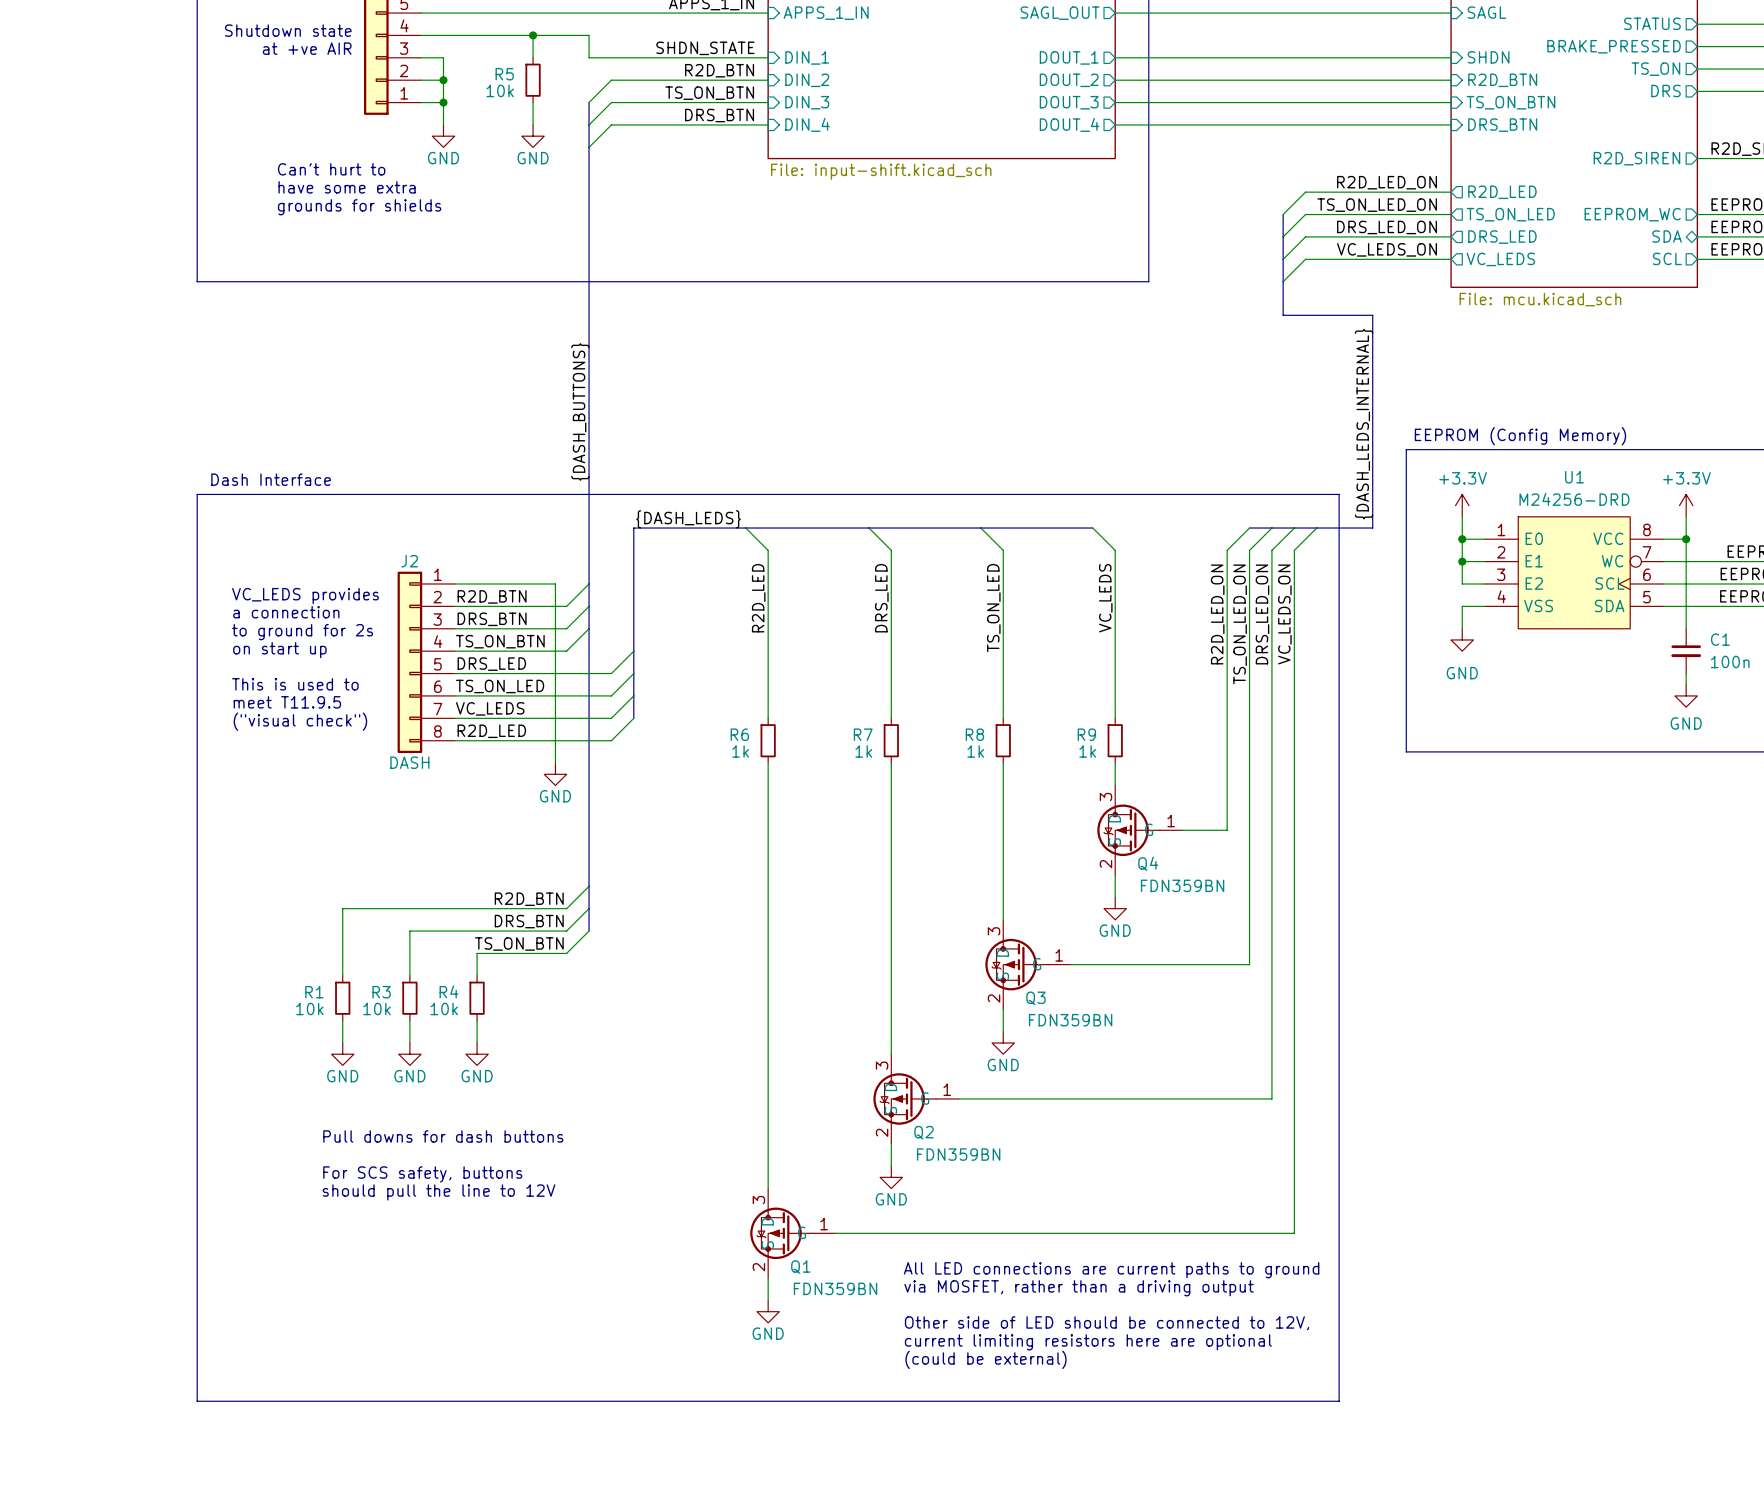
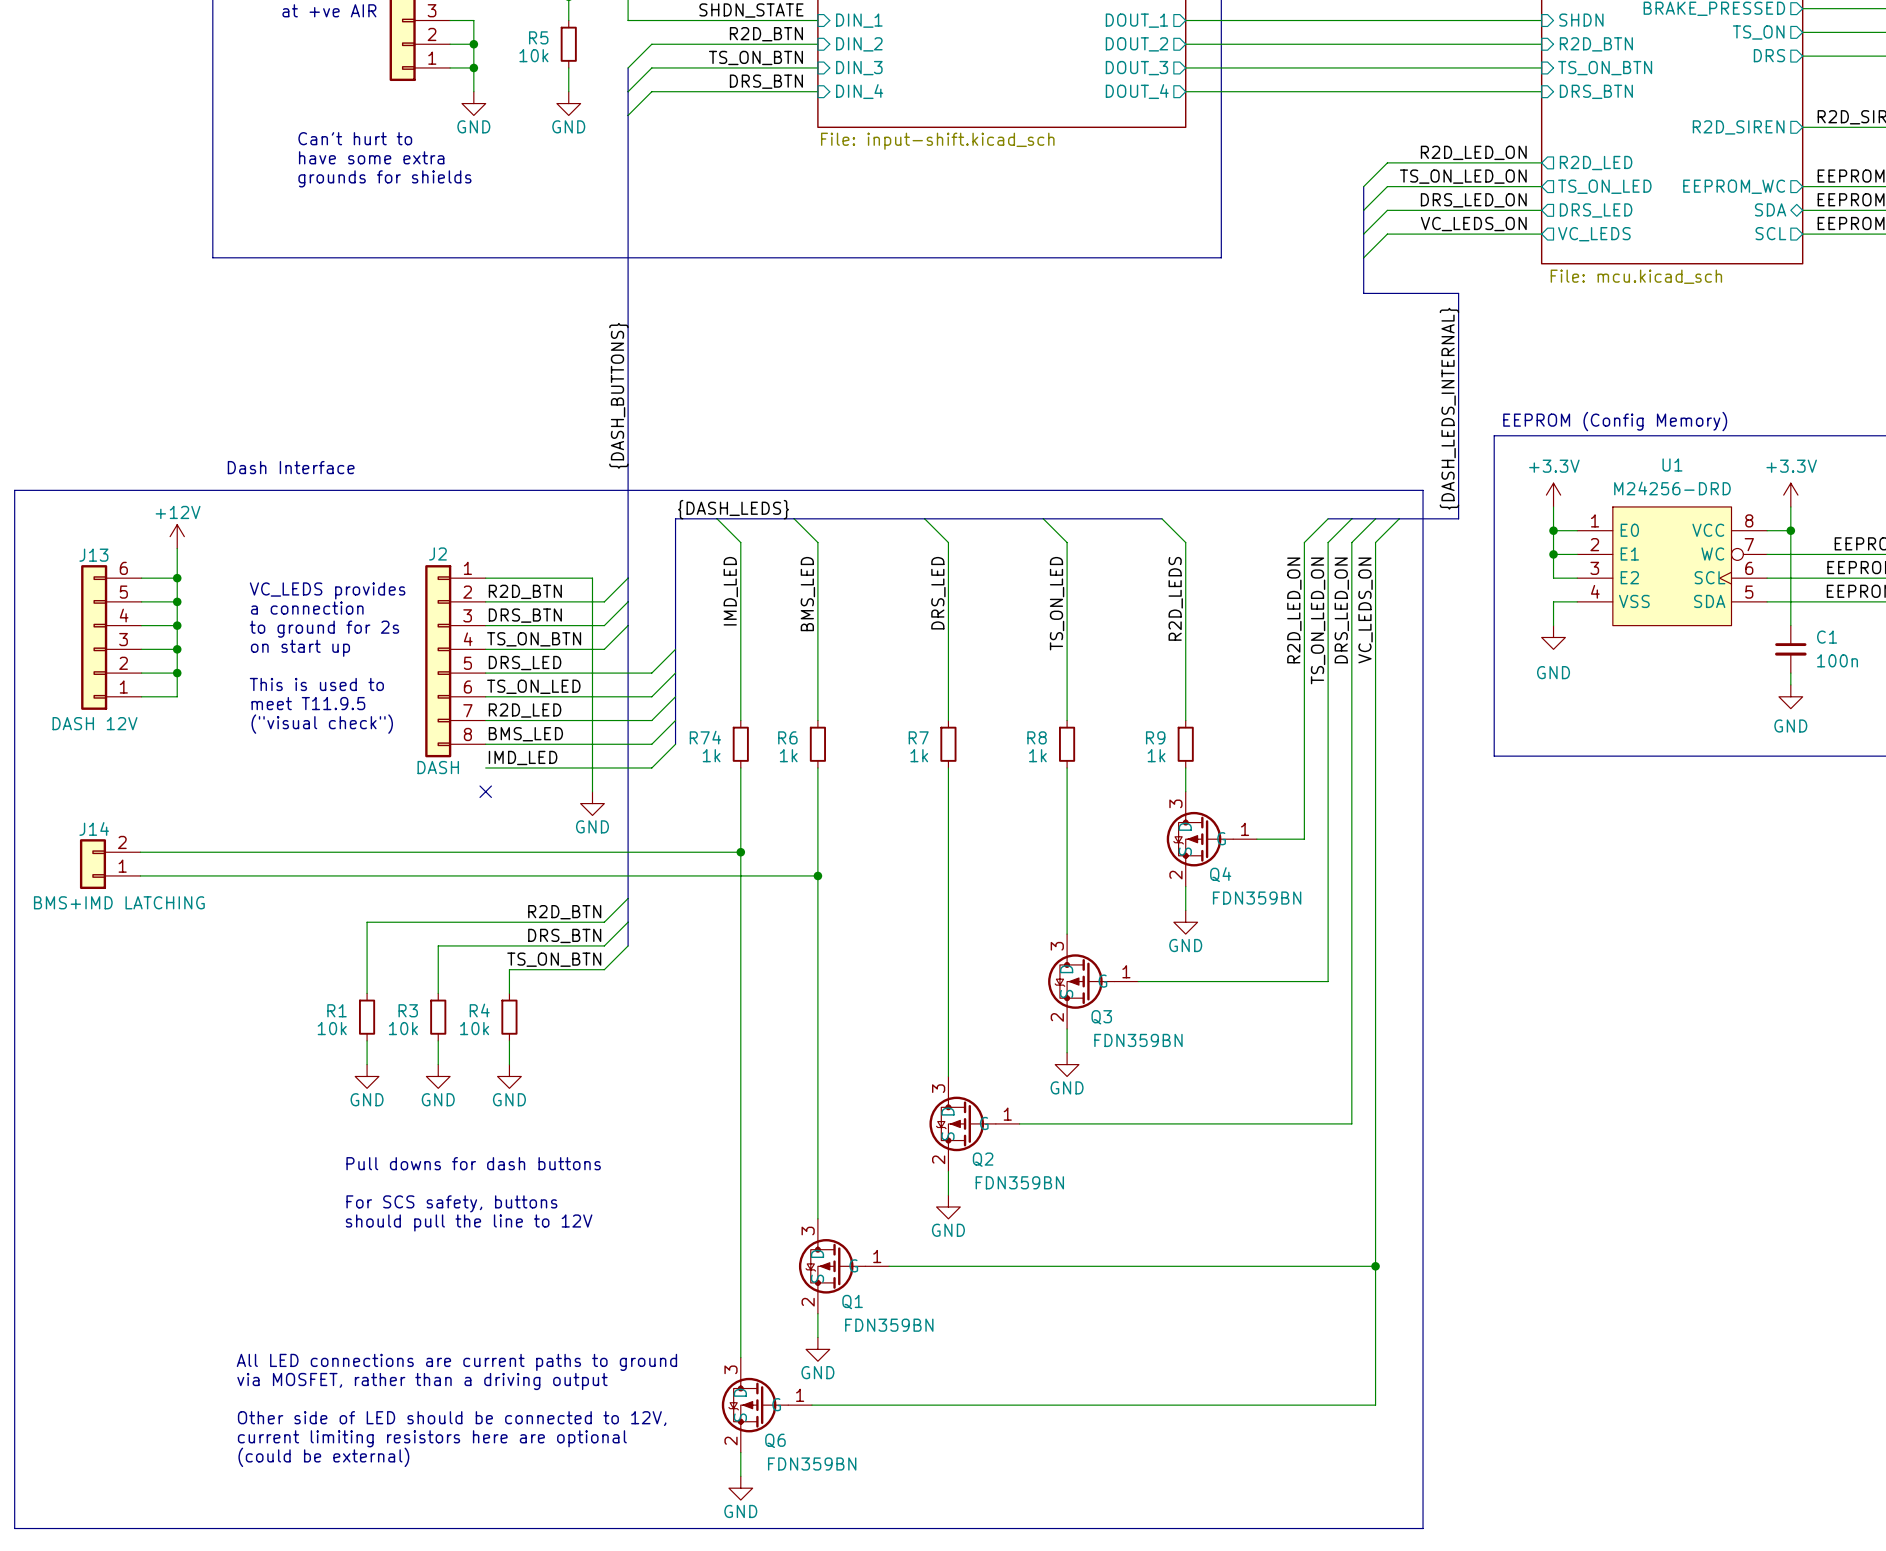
line: (1339, 501) (1339, 494) (197, 494) (197, 1401) (1339, 1401) -> (1423, 490) (14, 490) (14, 1528) (1423, 1528) (1423, 1444)
wire: none -> (717, 518) (740, 542) (740, 720)
power symbol: none -> +12V (177, 536)
wire: none -> (177, 548) (177, 696) (141, 696)
wire: none -> (141, 578) (177, 578)
junction: none -> (177, 578)
label: none -> IMD_LED (730, 591)
label: R2D_LED (758, 598) -> BMS_LED (807, 594)
label: VC_LEDS (1105, 598) -> R2D_LEDS (1175, 598)
wire: none -> (141, 601) (177, 601)
junction: none -> (177, 601)
wire: none -> (141, 625) (177, 625)
junction: none -> (177, 625)
J13: none -> DASH 12V (111, 637)
wire: none -> (141, 649) (177, 649)
junction: none -> (177, 649)
wire: none -> (141, 673) (177, 673)
junction: none -> (177, 673)
label: VC_LEDS (490, 708) -> R2D_LED (525, 710)
bus: none -> (675, 720) (675, 744)
label: R2D_LED (491, 731) -> BMS_LED (525, 734)
wire: none -> (675, 744) (651, 767) (485, 767)
R74: none -> 1k (740, 744)
label: none -> IMD_LED (523, 757)
wire: none -> (740, 767) (740, 1357)
power symbol position: GND (555, 774) -> GND (592, 803)
no-connect mark: none -> (485, 791)
wire: none -> (140, 852) (740, 852)
junction: none -> (740, 852)
J14: none -> BMS+IMD LATCHING (110, 864)
wire: none -> (140, 875) (817, 875)
junction: none -> (817, 875)
wire: none -> (1375, 1266) (1375, 1405) (811, 1405)
junction: none -> (1375, 1266)
text: All LED connections are current paths to ground (1111, 1270) -> none
text: via MOSFET, rather than a driving output (1079, 1288) -> none
text: none -> All LED connections are current paths to ground (456, 1362)
text: Other side of LED should be connected to 12V, (1107, 1323) -> none
text: none -> via MOSFET, rather than a driving output (422, 1381)
text: current limiting resistors here are optional (1088, 1342) -> none
text: (could be external) (986, 1359) -> none
Q6: none -> FDN359BN (766, 1405)
text: none -> Other side of LED should be connected to 12V, (452, 1418)
text: none -> current limiting resistors here are optional (432, 1438)
wire: none -> (740, 1452) (740, 1476)
text: none -> (could be external) (323, 1457)
power symbol: none -> GND (740, 1488)

